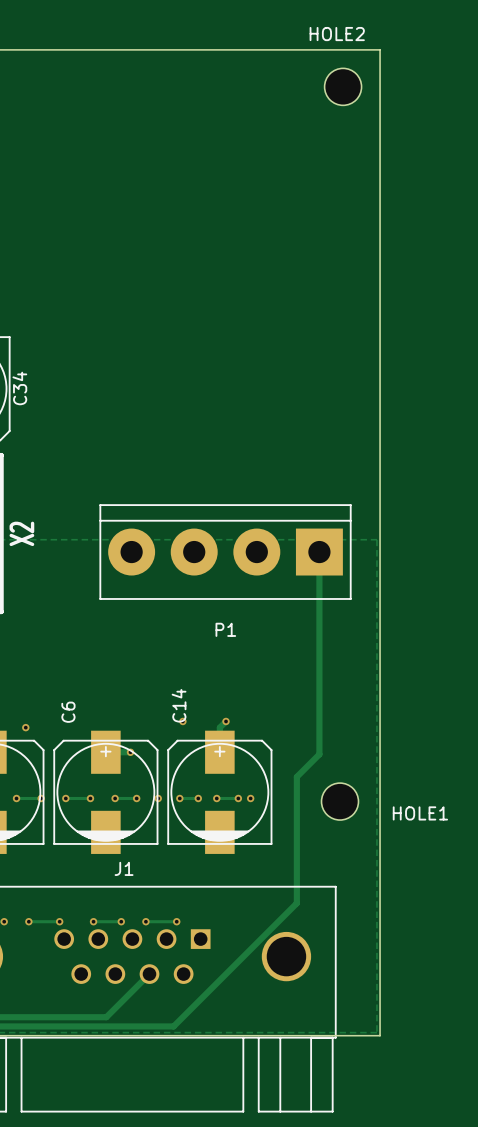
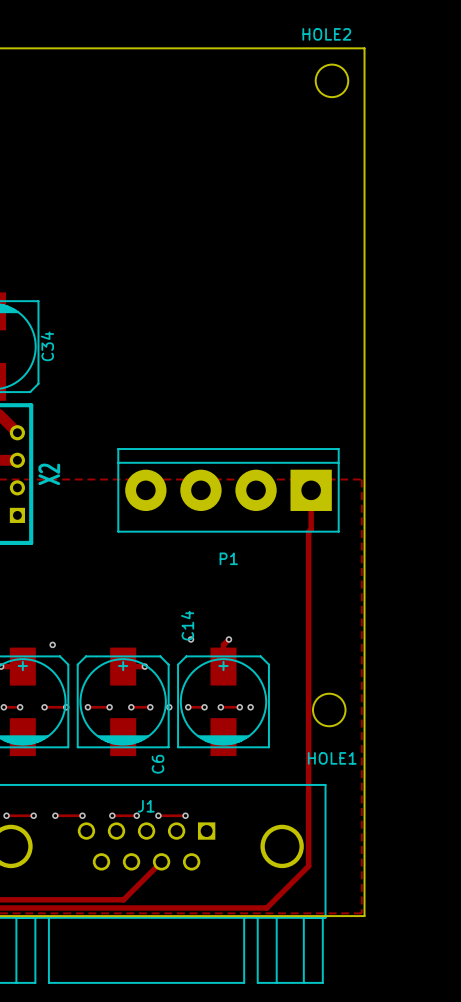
track: (319, 596) (319, 754) (296, 776) (296, 903) (173, 1026) -> (311, 529) (308, 532) (308, 866) (266, 907) (182, 907)
C6 name position: C6 (68, 712) -> C6 (158, 764)
HOLE1 name position: HOLE1 (420, 813) -> HOLE1 (332, 758)
J1 name position: J1 (124, 868) -> J1 (146, 806)

